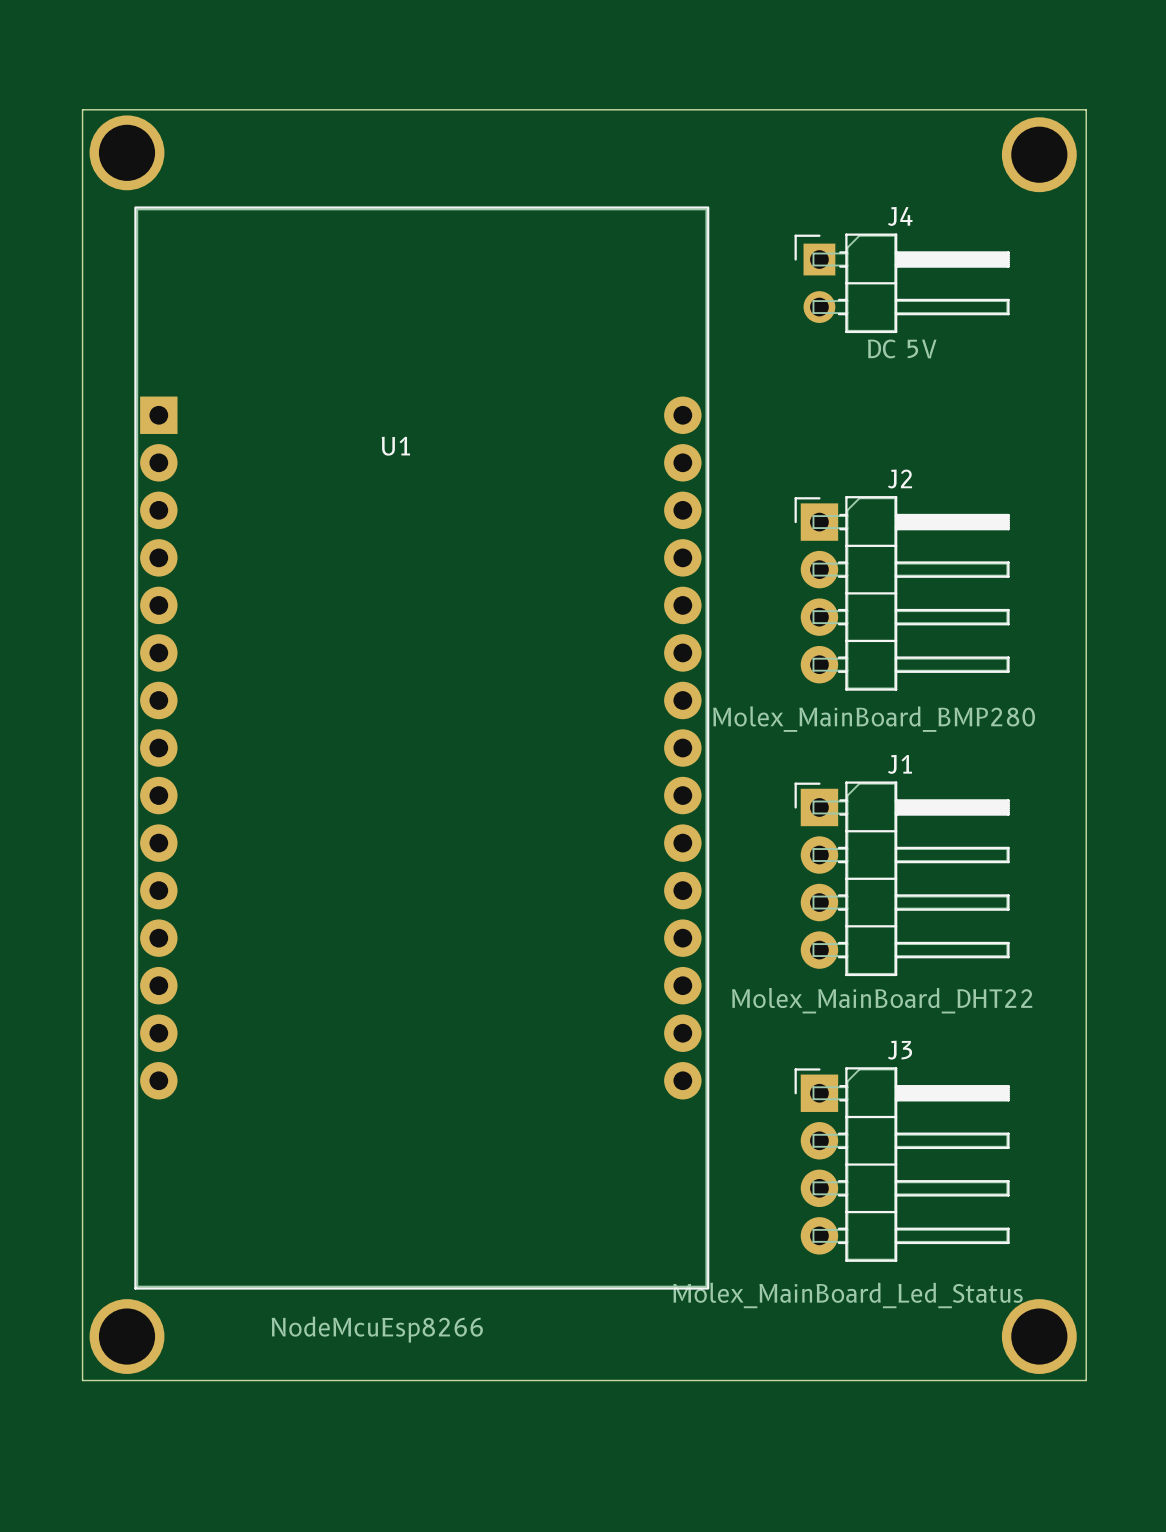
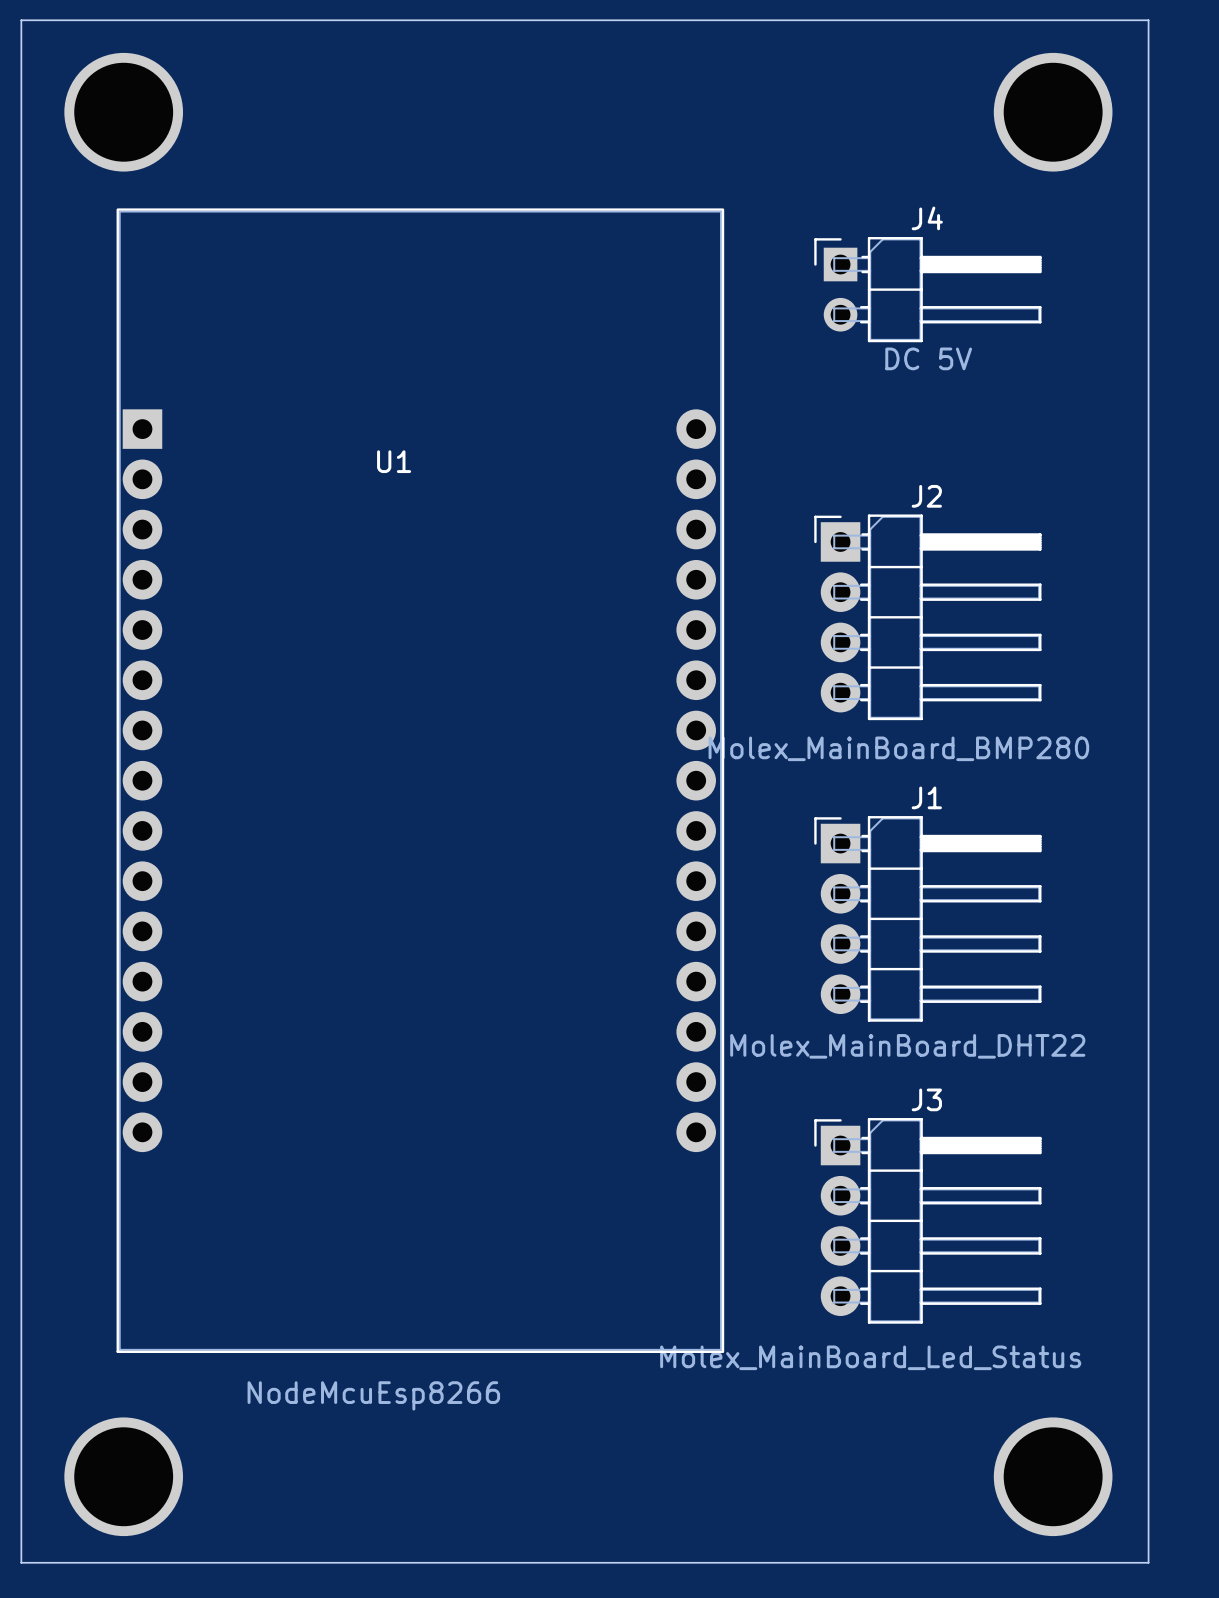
board edge: (82, 109) (1086, 109) (1086, 1380) (82, 1380) (82, 109) -> (21, 20) (21, 1562) (1148, 1562) (1148, 20) (21, 20)
part: none -> (123, 112)
part: none -> (1053, 112)
part: (127, 152) -> none
part: (1039, 154) -> none
part: (127, 1336) -> none
part: (1039, 1336) -> none
part: none -> (123, 1476)
part: none -> (1053, 1476)

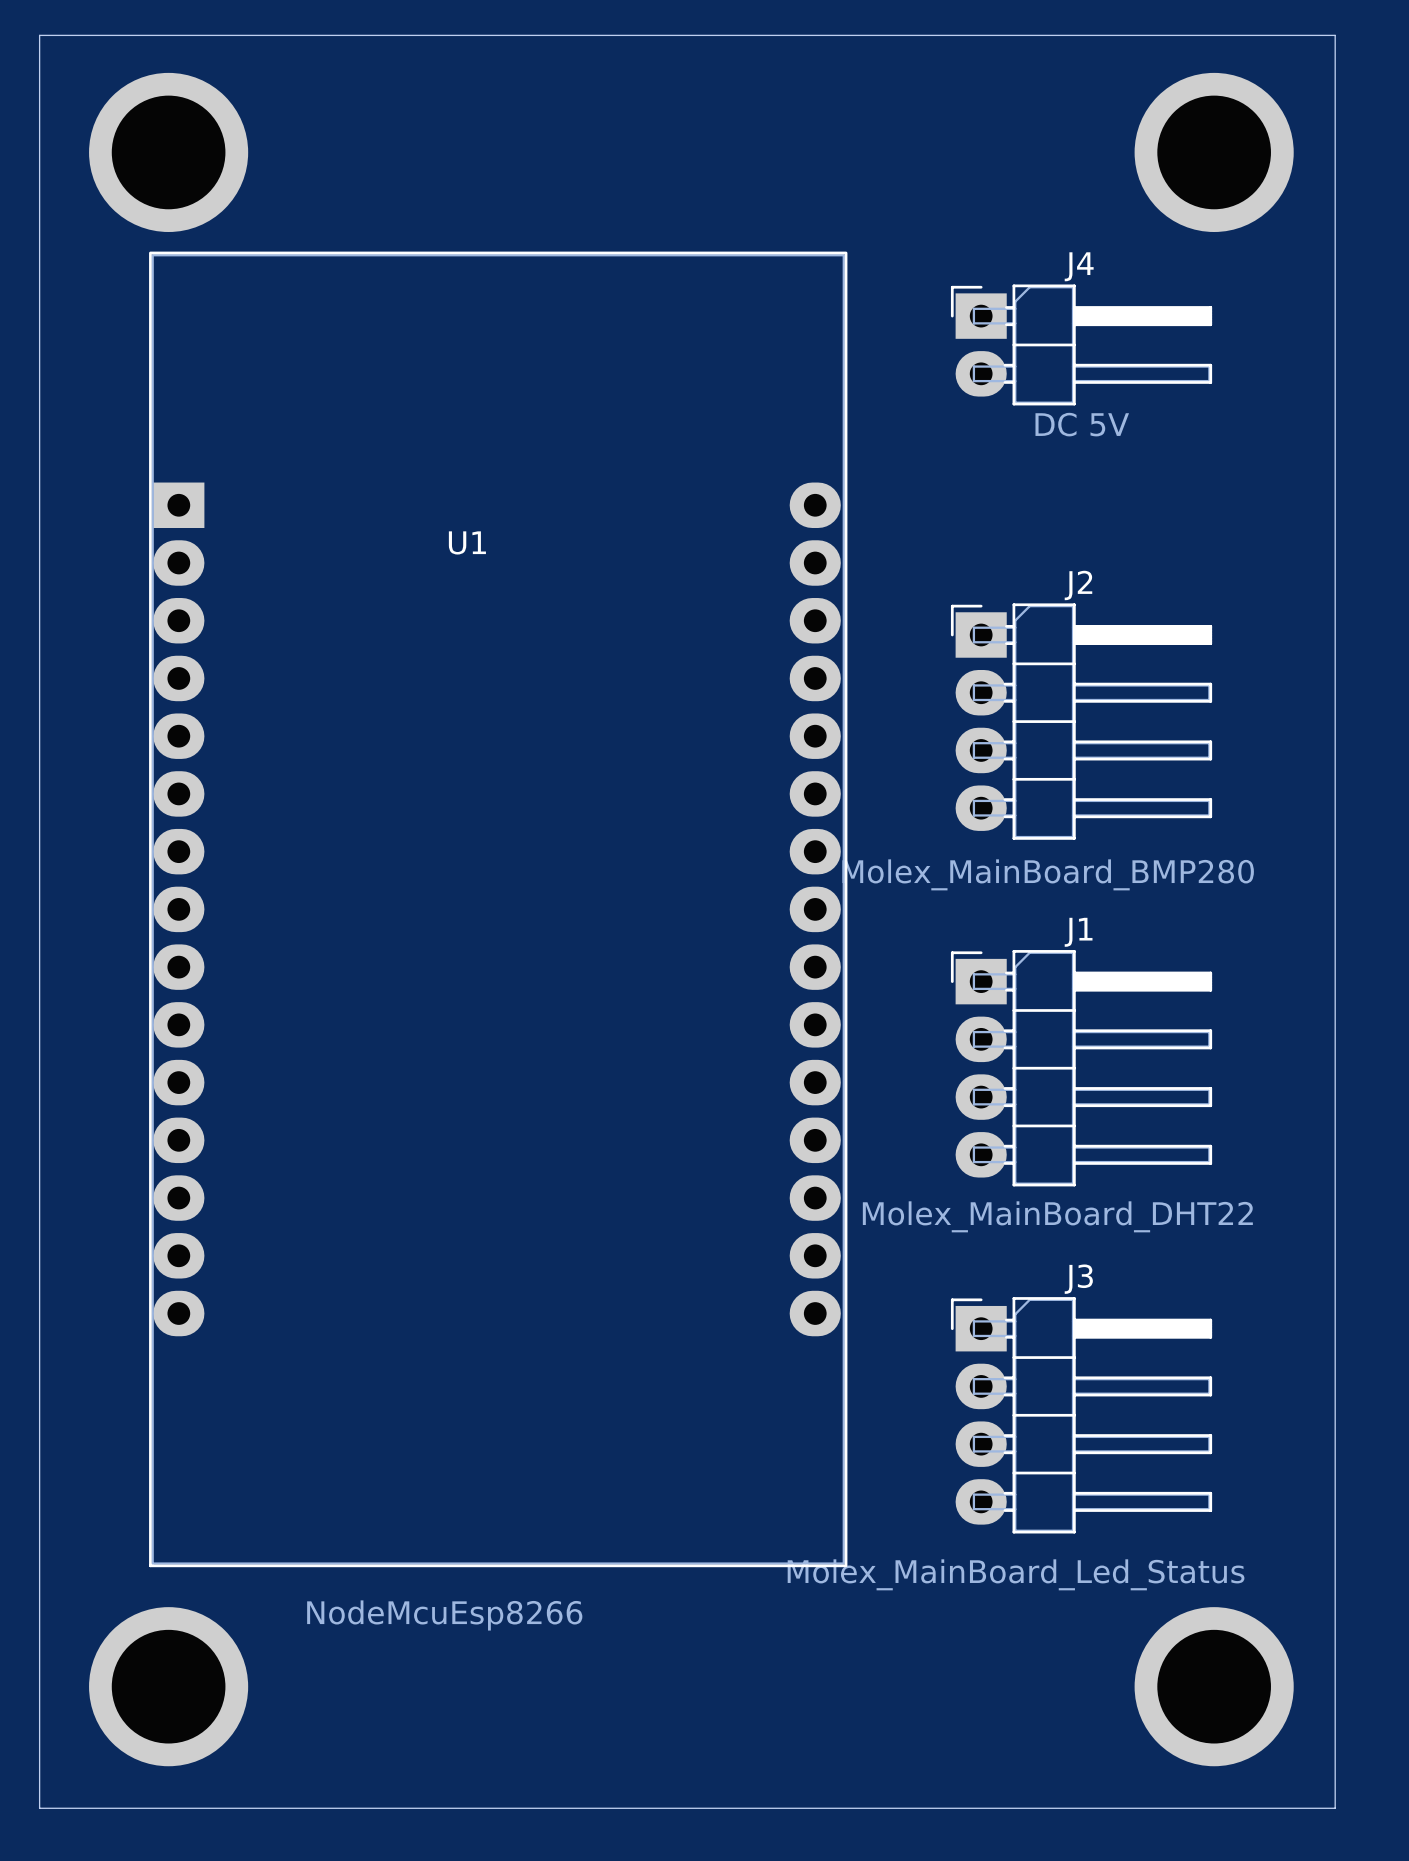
part footprint: [64, 52, 184, 172] -> [89, 72, 249, 233]
part footprint: [993, 52, 1113, 172] -> [1134, 72, 1294, 233]
U1 footprint: [116, 208, 725, 1354] -> [149, 251, 848, 1568]
J4 footprint: [814, 237, 1042, 343] -> [950, 284, 1213, 406]
J2 footprint: [814, 514, 1042, 721] -> [950, 603, 1213, 840]
J1 footprint: [814, 816, 1042, 1022] -> [950, 950, 1213, 1187]
J3 footprint: [814, 1118, 1042, 1324] -> [950, 1297, 1213, 1534]
part: none -> (168, 1686)
part: none -> (1214, 1686)
part: (123, 1476) -> none
part: (1053, 1476) -> none

